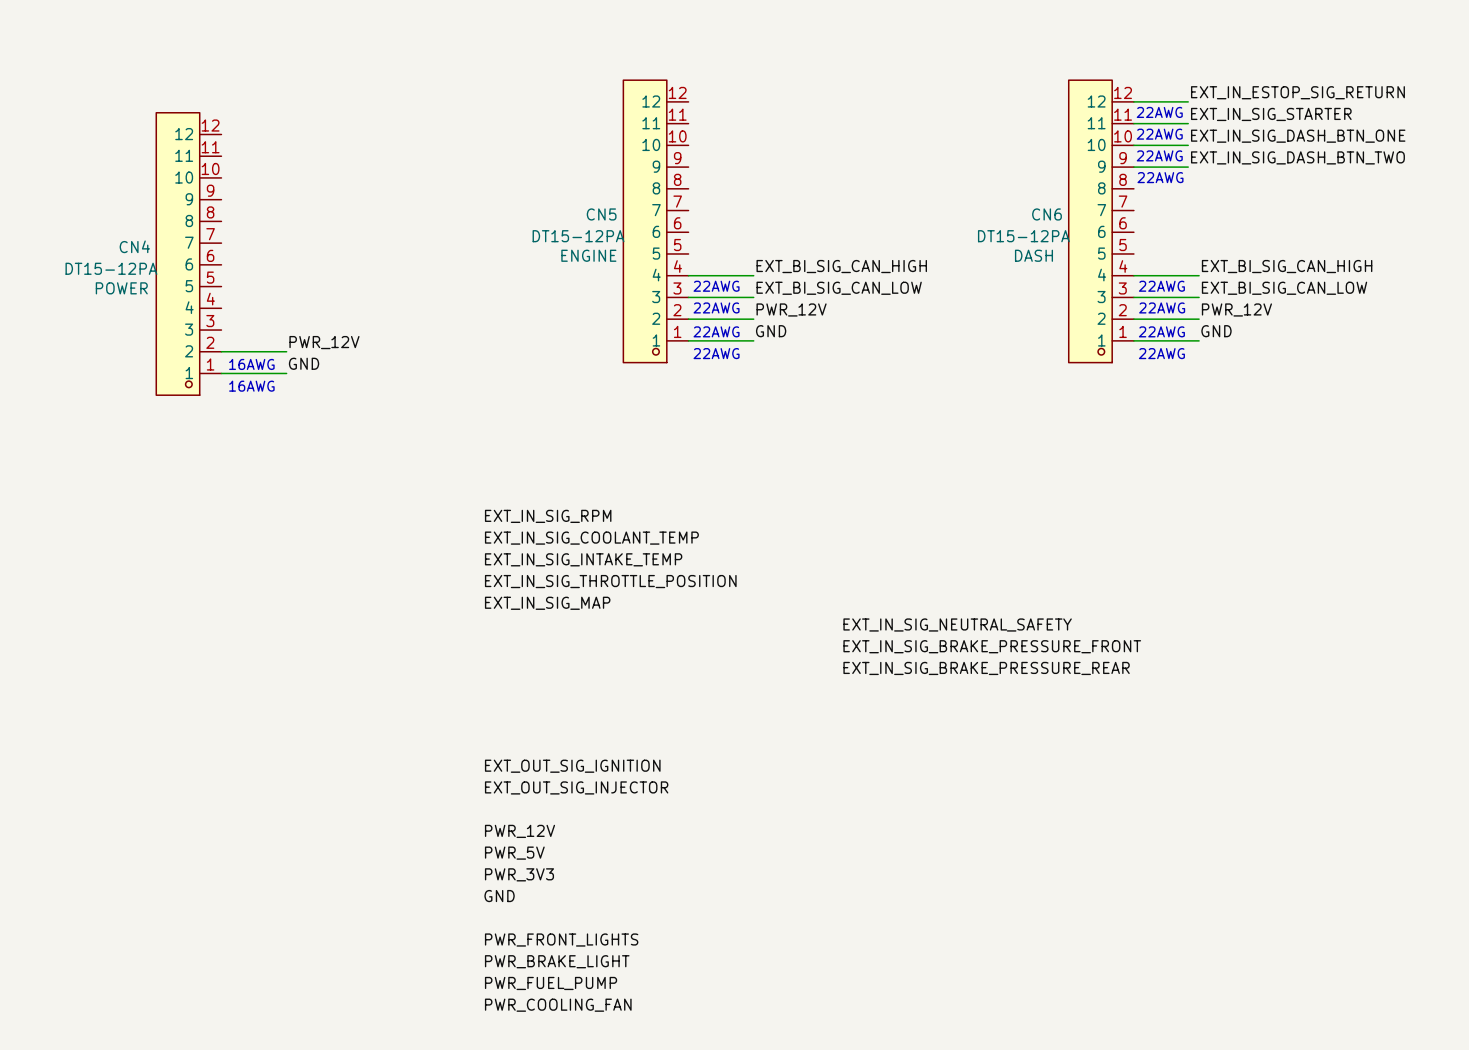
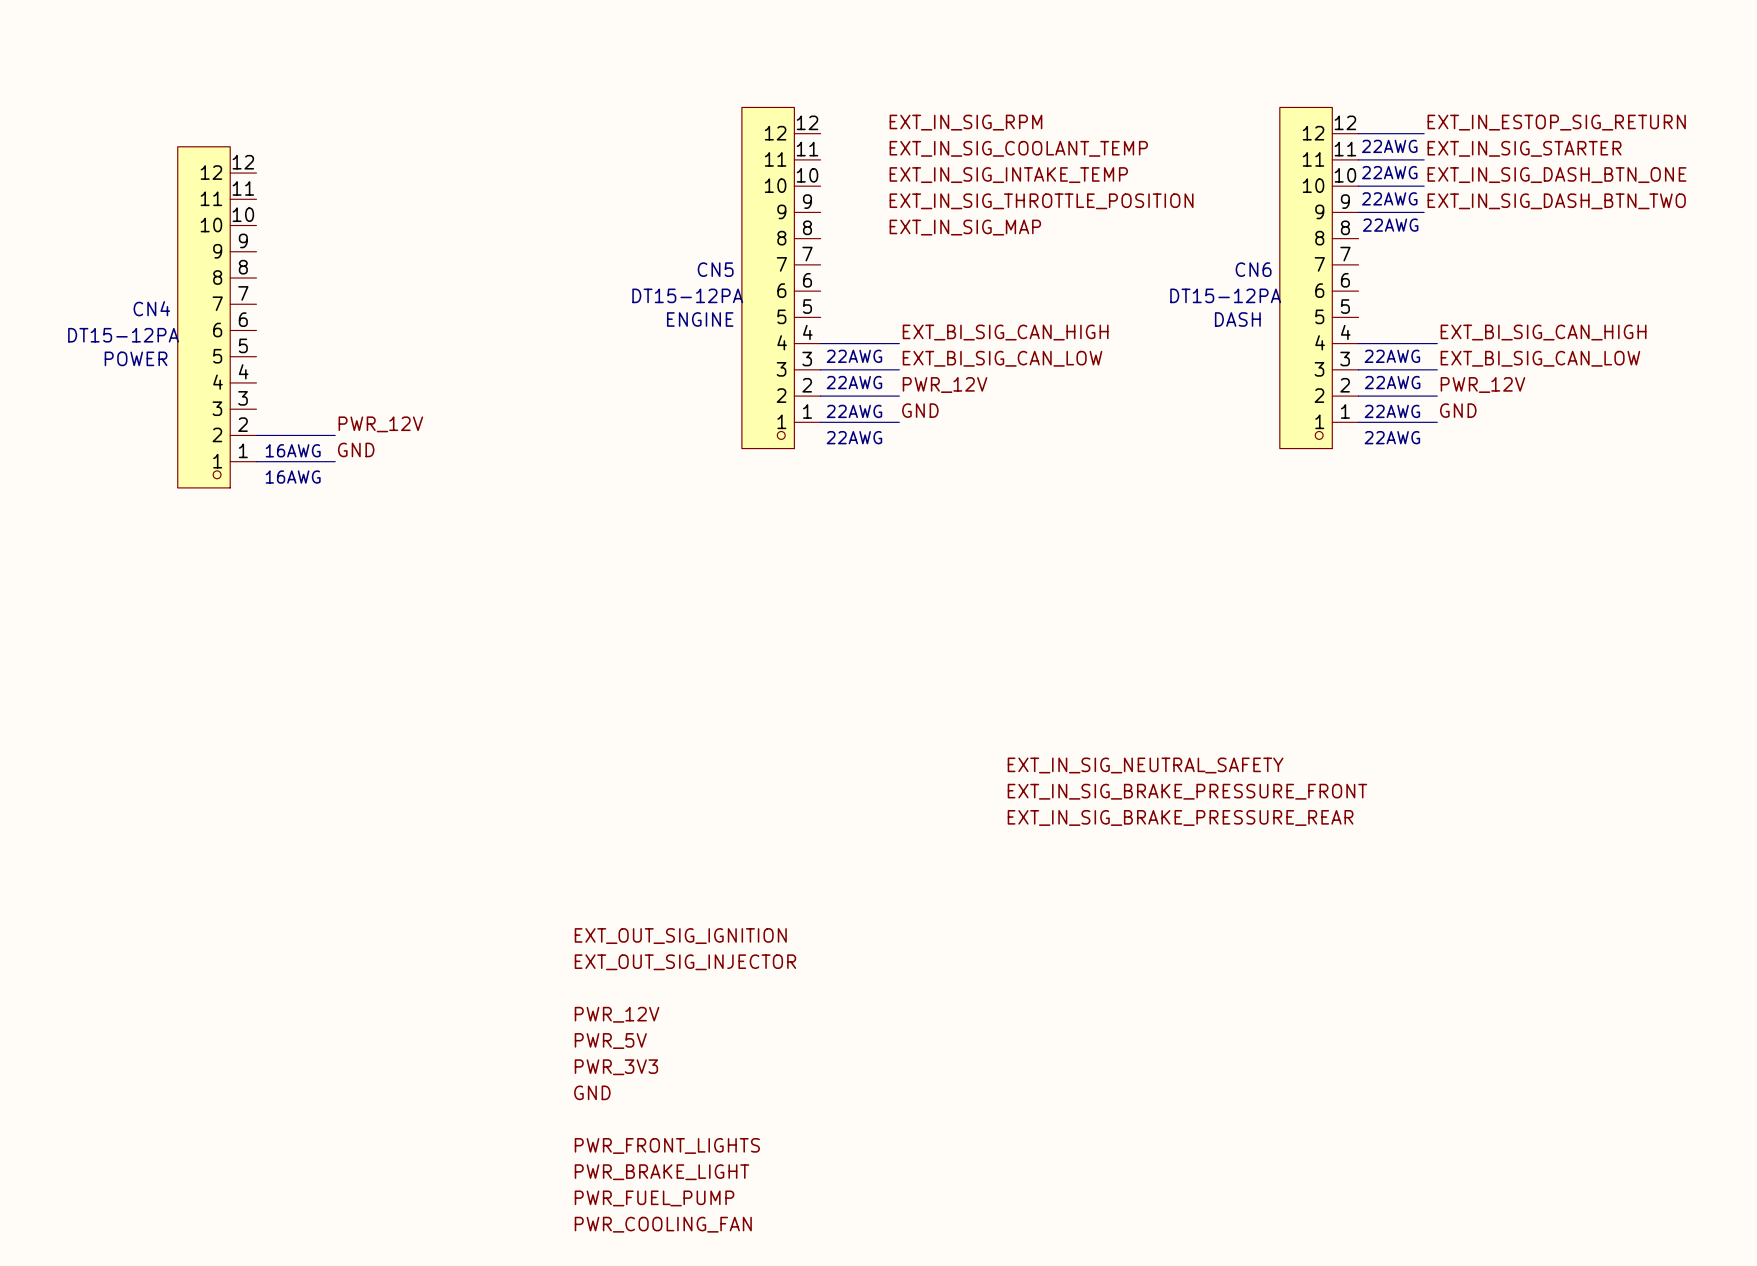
label: none -> EXT_IN_SIG_RPM (965, 122)
label: none -> EXT_IN_SIG_COOLANT_TEMP (1018, 148)
label: none -> EXT_IN_SIG_INTAKE_TEMP (1008, 175)
label: none -> EXT_IN_SIG_THROTTLE_POSITION (1041, 201)
label: none -> EXT_IN_SIG_MAP (965, 227)
label: EXT_IN_SIG_RPM (548, 516) -> none
label: EXT_IN_SIG_COOLANT_TEMP (591, 538) -> none
label: EXT_IN_SIG_INTAKE_TEMP (583, 559) -> none
label: EXT_IN_SIG_THROTTLE_POSITION (610, 581) -> none
label: EXT_IN_SIG_MAP (547, 603) -> none

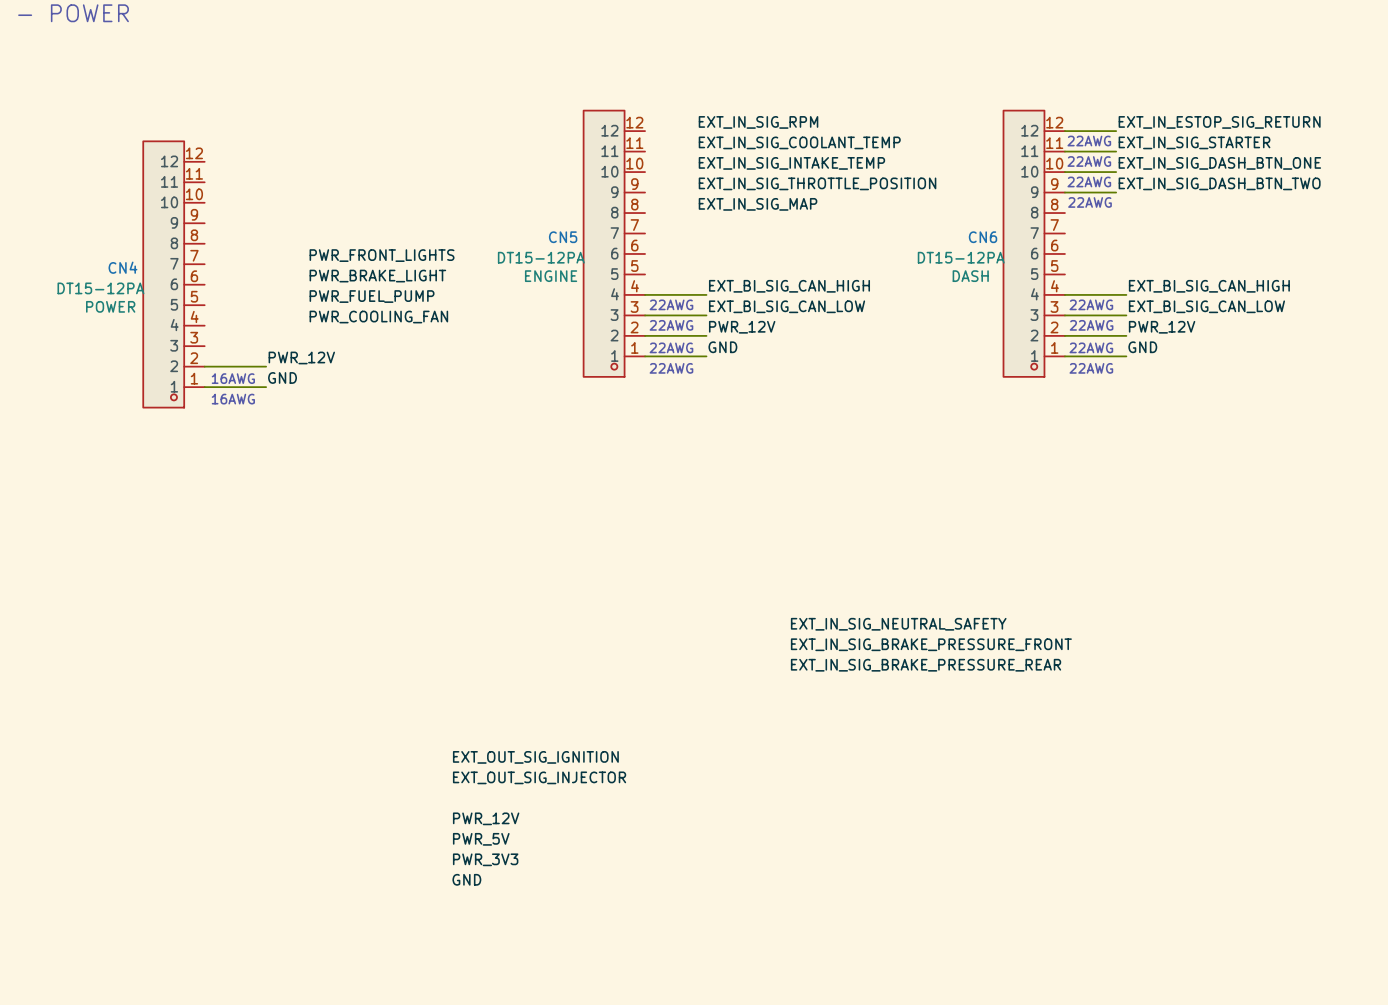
label: none -> PWR_FRONT_LIGHTS (382, 255)
label: none -> PWR_BRAKE_LIGHT (377, 276)
label: none -> PWR_FUEL_PUMP (372, 296)
label: none -> PWR_COOLING_FAN (378, 317)
label: PWR_FRONT_LIGHTS (667, 1145) -> none
label: PWR_BRAKE_LIGHT (662, 1172) -> none
label: PWR_FUEL_PUMP (654, 1198) -> none
label: PWR_COOLING_FAN (663, 1224) -> none

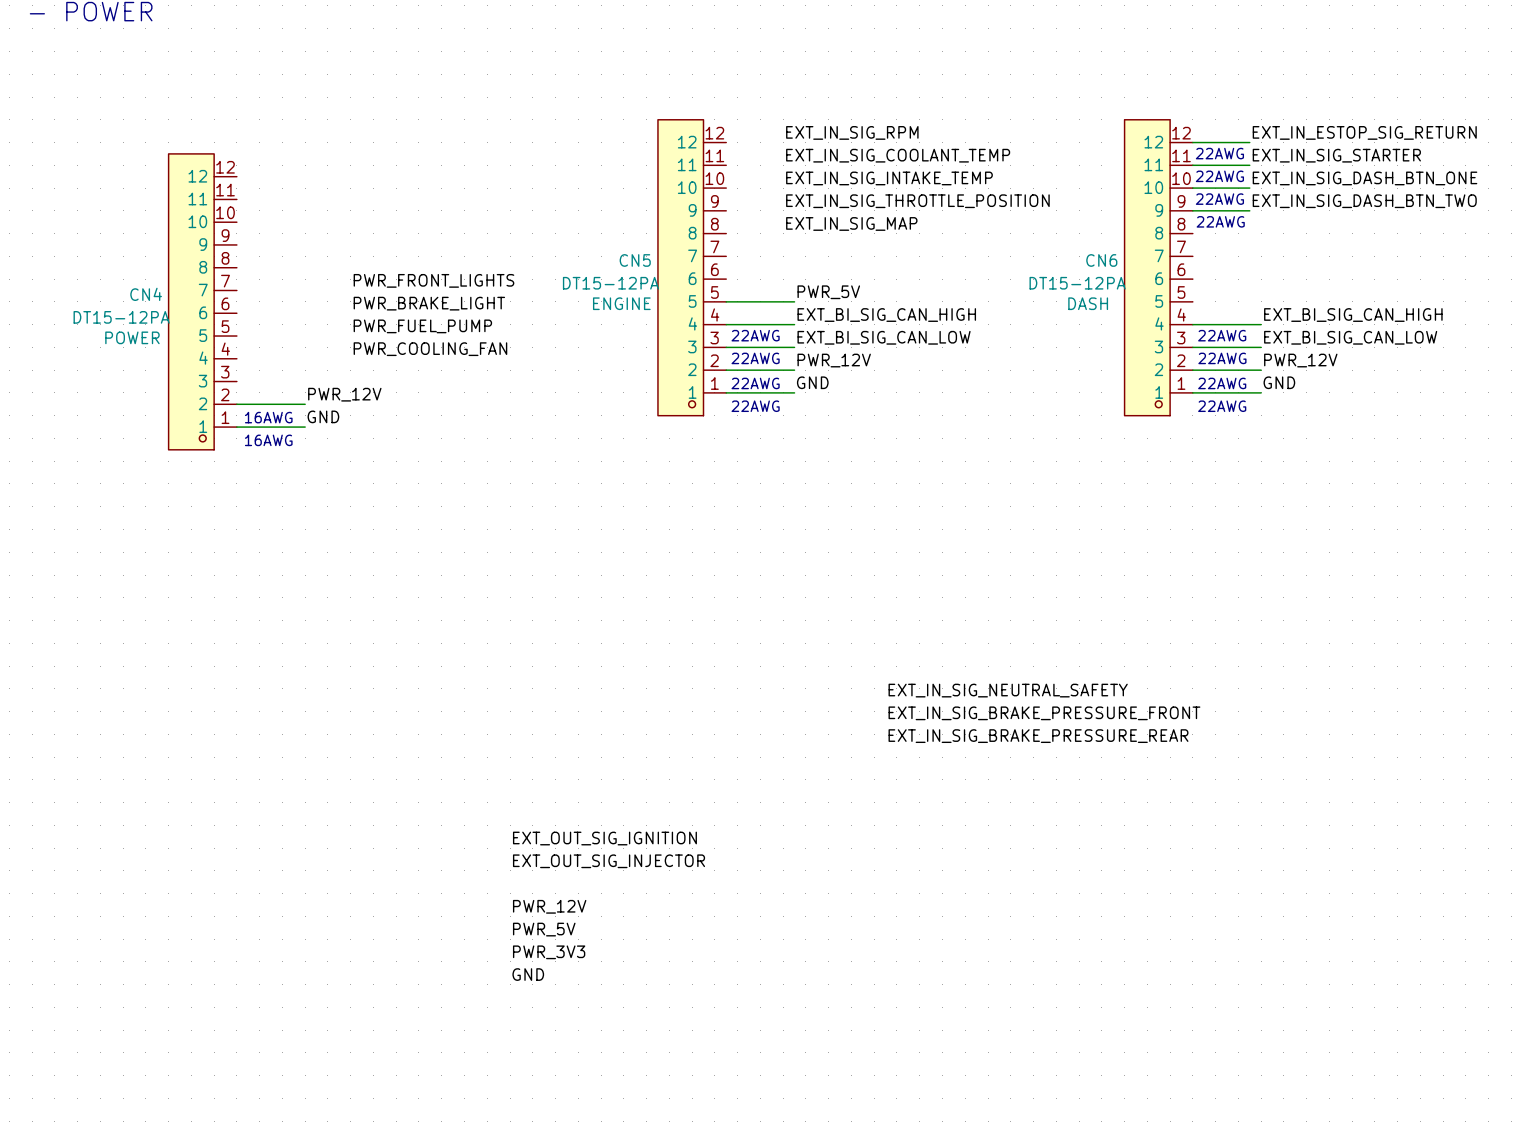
label: none -> PWR_5V (828, 292)
wire: none -> (726, 301) (794, 301)

